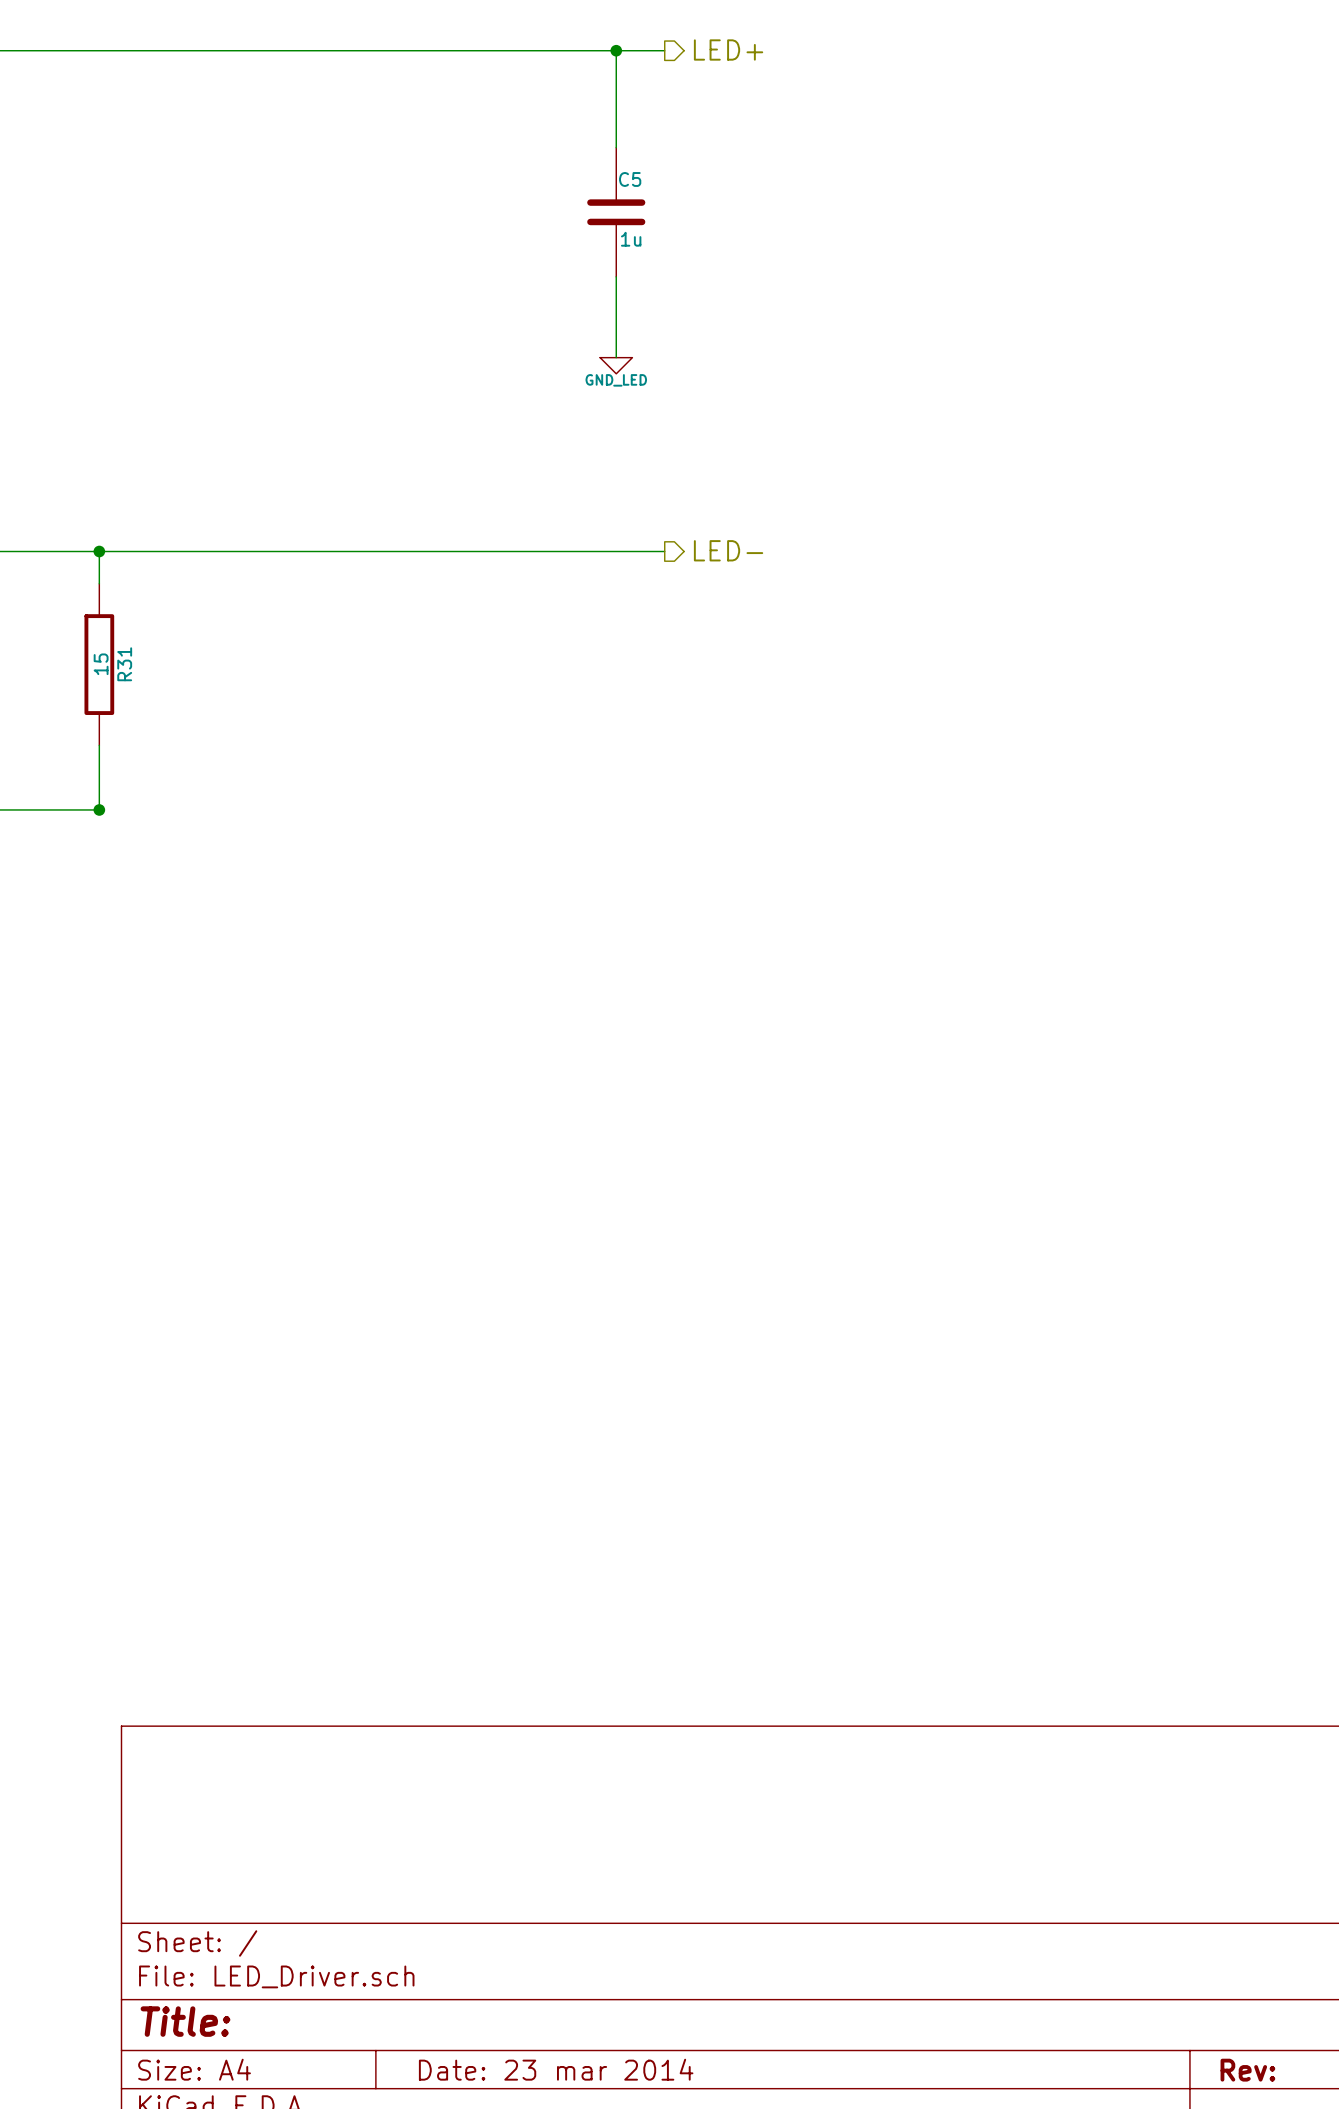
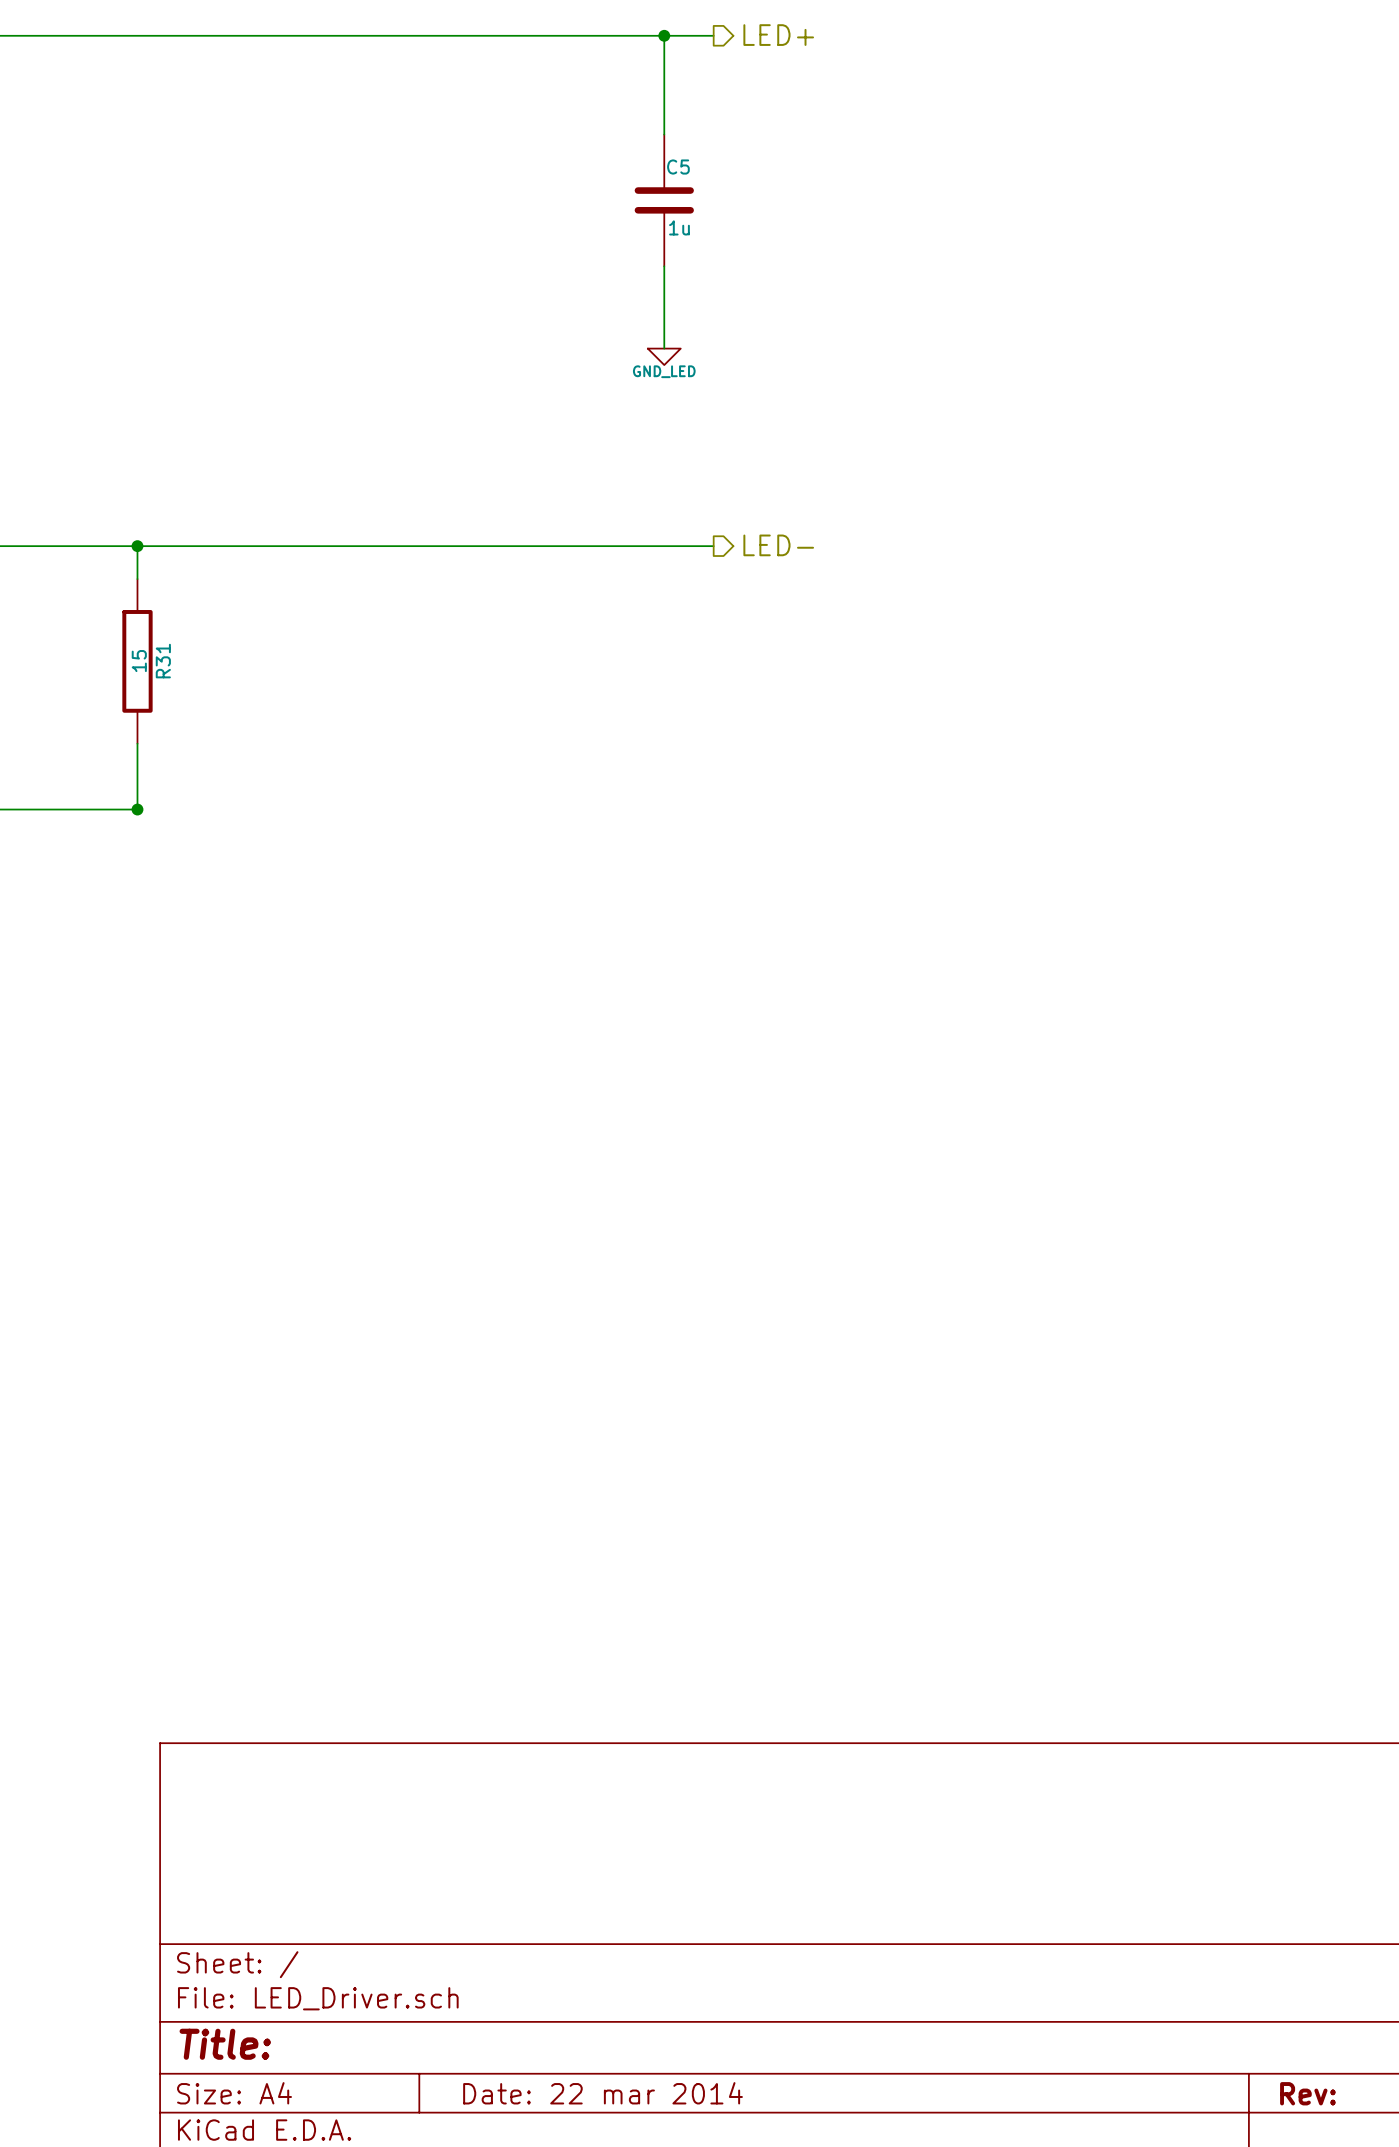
title block: Date: 23 mar 2014 (556, 2069) -> Date: 22 mar 2014 (603, 2093)

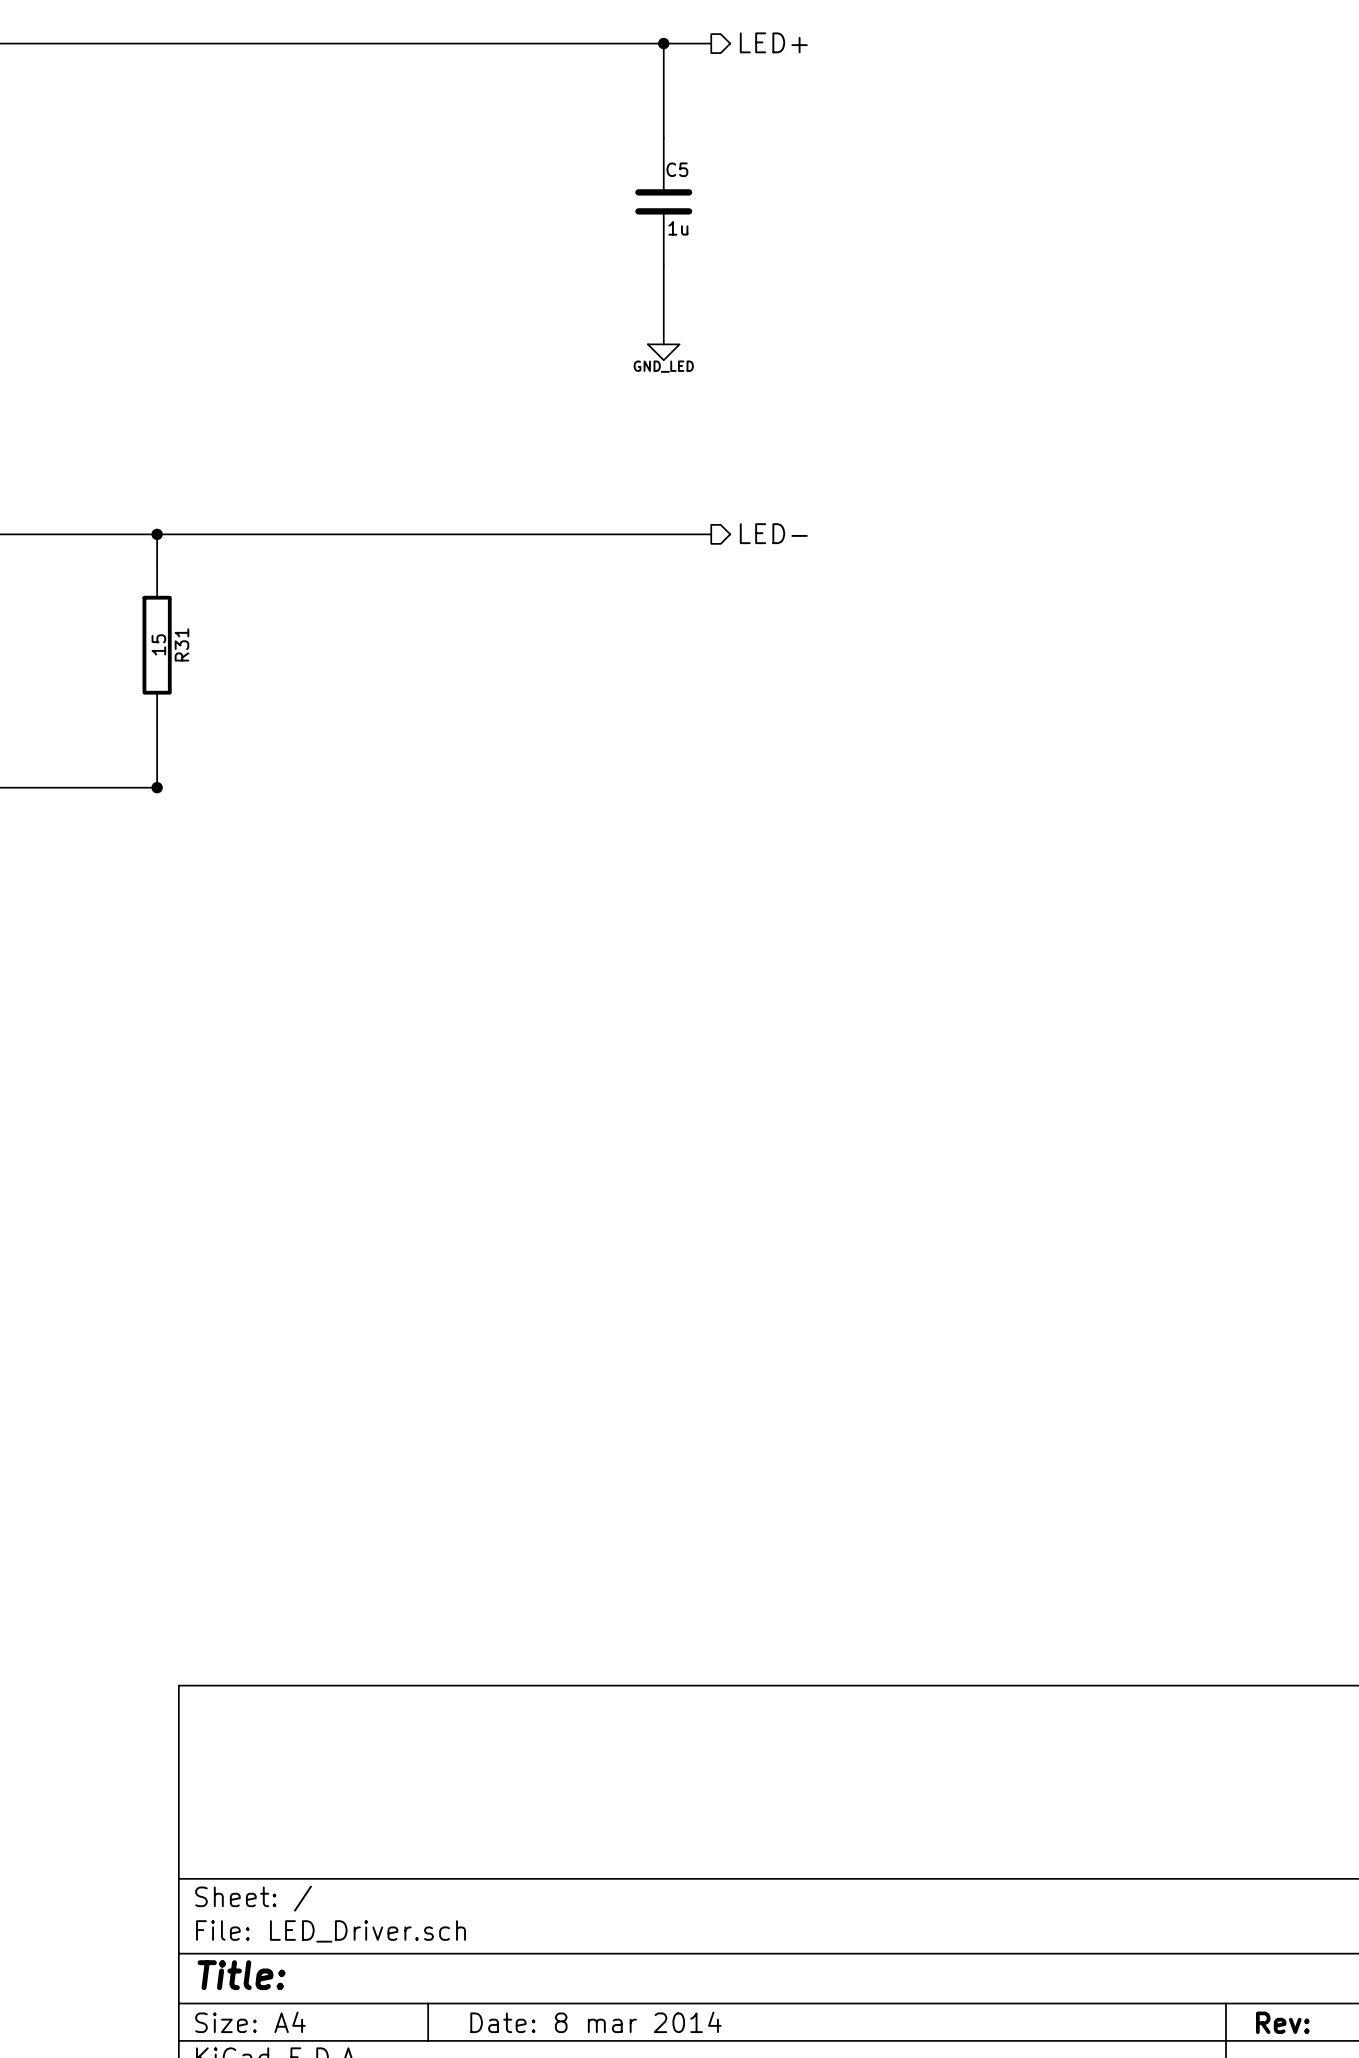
title block: Date: 22 mar 2014 (603, 2093) -> Date: 8 mar 2014 (595, 2022)

